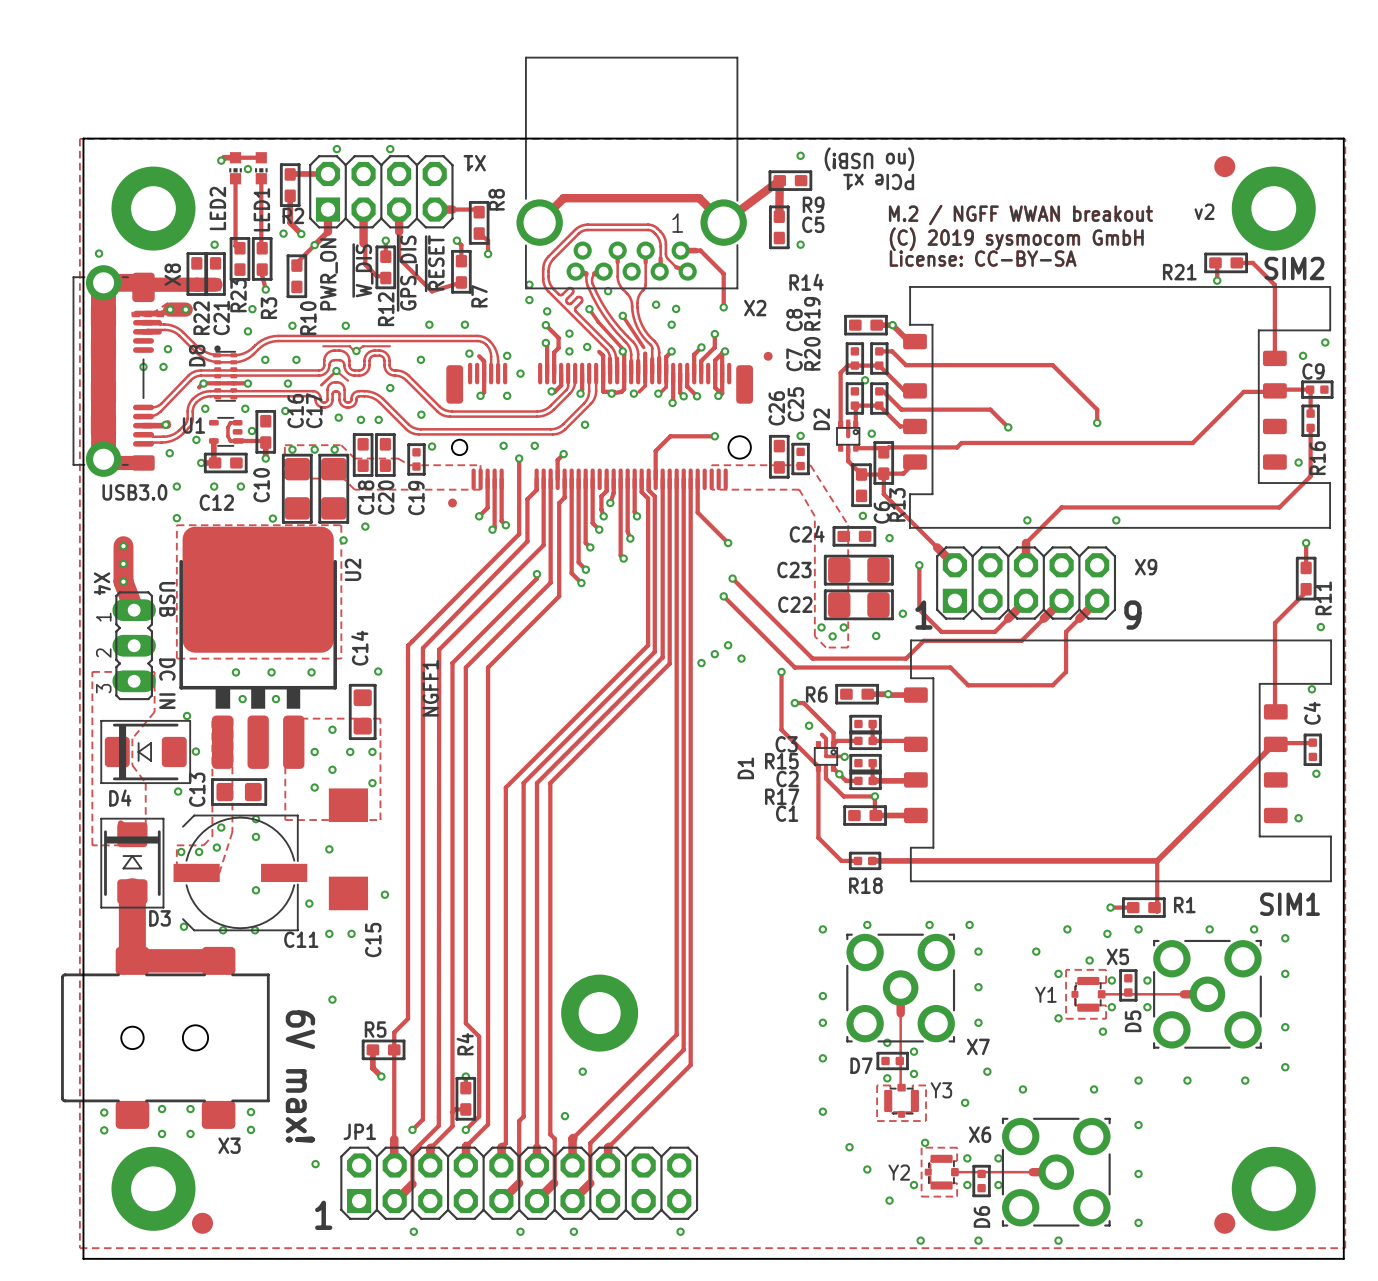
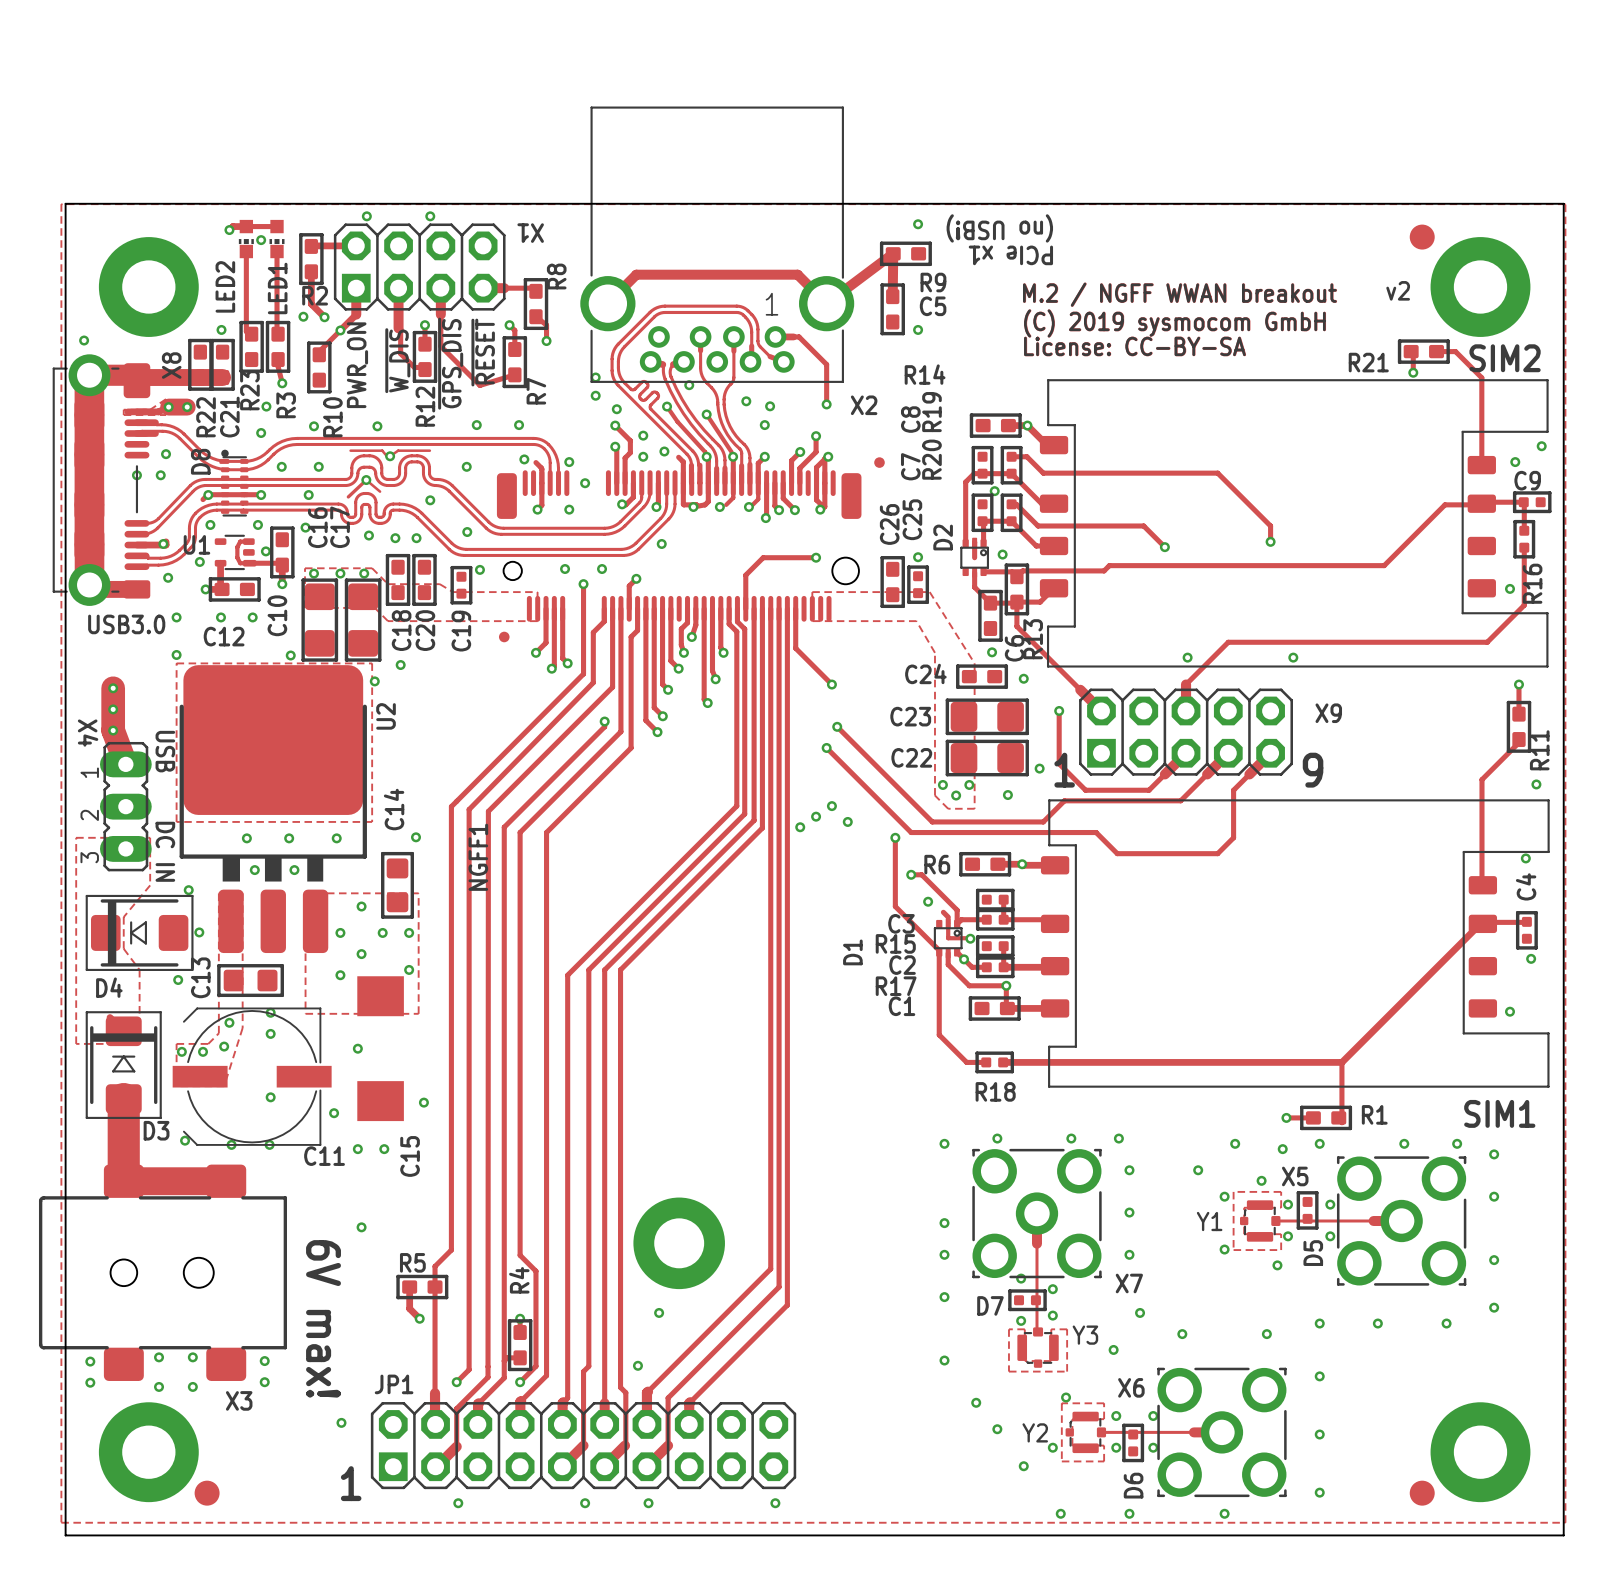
via: none -> (733, 456)

